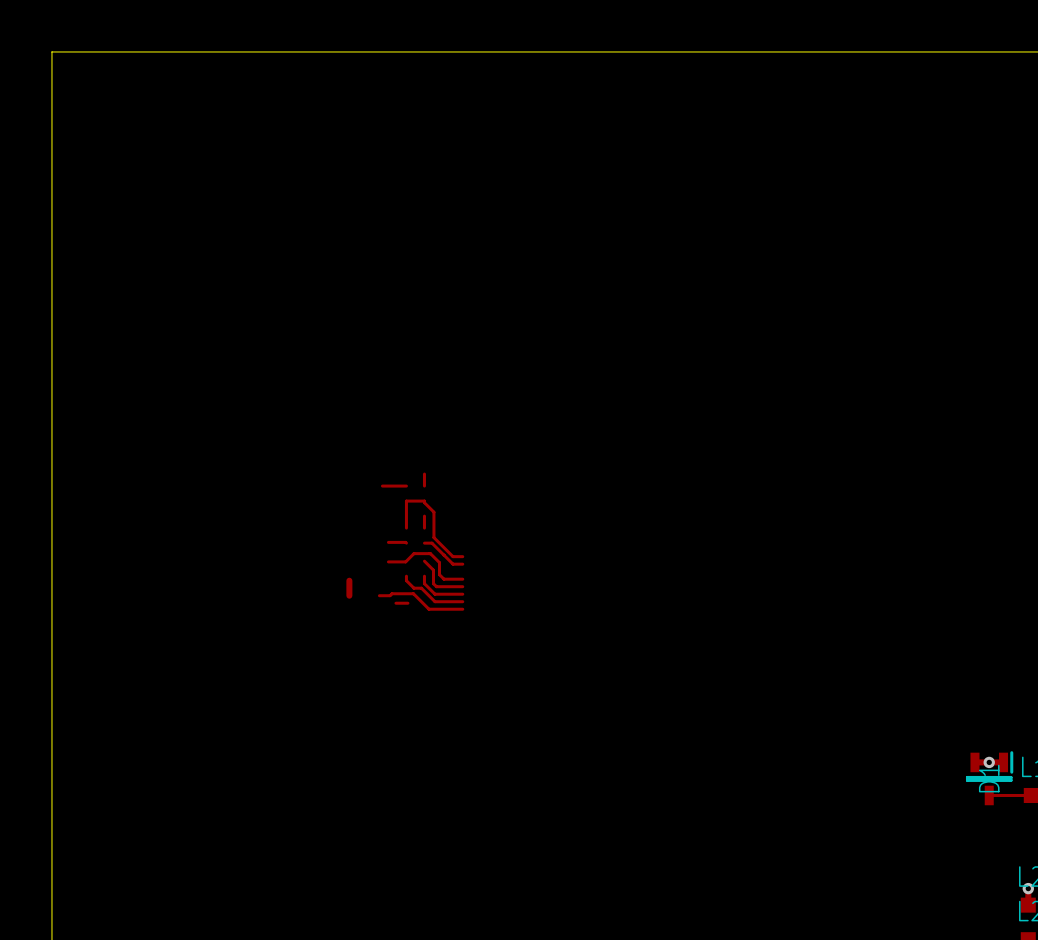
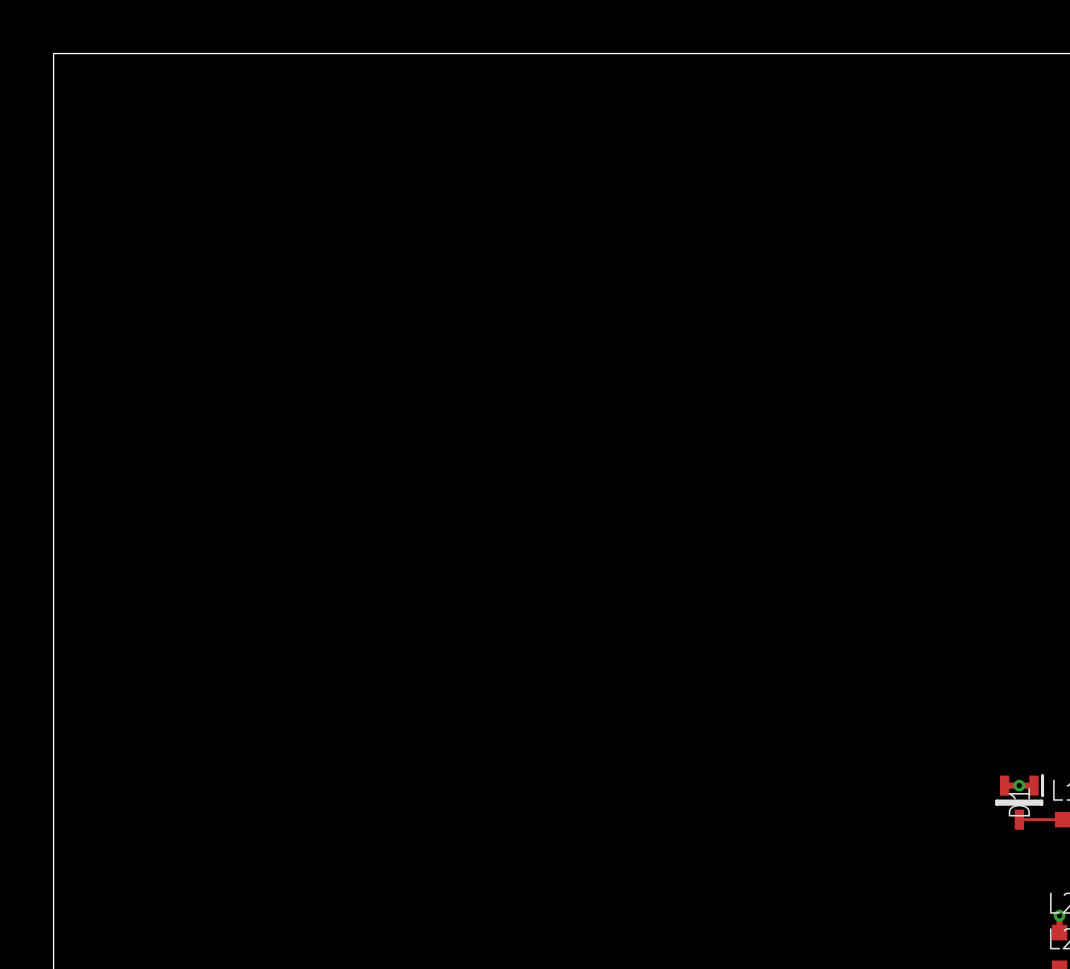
top track: (424, 474) (424, 486) -> none
top track: (382, 486) (406, 486) -> none
top track: (424, 516) (424, 528) -> none
top track: (406, 528) (406, 501) (424, 501) (433, 512) (433, 537) (452, 556) (462, 556) -> none
top track: (388, 542) (406, 543) -> none
top track: (424, 543) (431, 543) (453, 564) (462, 564) -> none
top track: (388, 561) (405, 561) (414, 553) (430, 553) (439, 562) (439, 574) (444, 579) (462, 579) -> none
top track: (424, 561) (433, 570) (433, 583) (436, 586) (462, 586) -> none
top track: (406, 576) (406, 580) (413, 588) (421, 588) (434, 601) (462, 601) -> none
top track: (424, 576) (424, 583) (434, 594) (462, 594) -> none
top track: (349, 580) (349, 595) -> none
top track: (379, 595) (413, 593) (428, 609) (462, 609) -> none
top track: (395, 603) (407, 603) -> none

